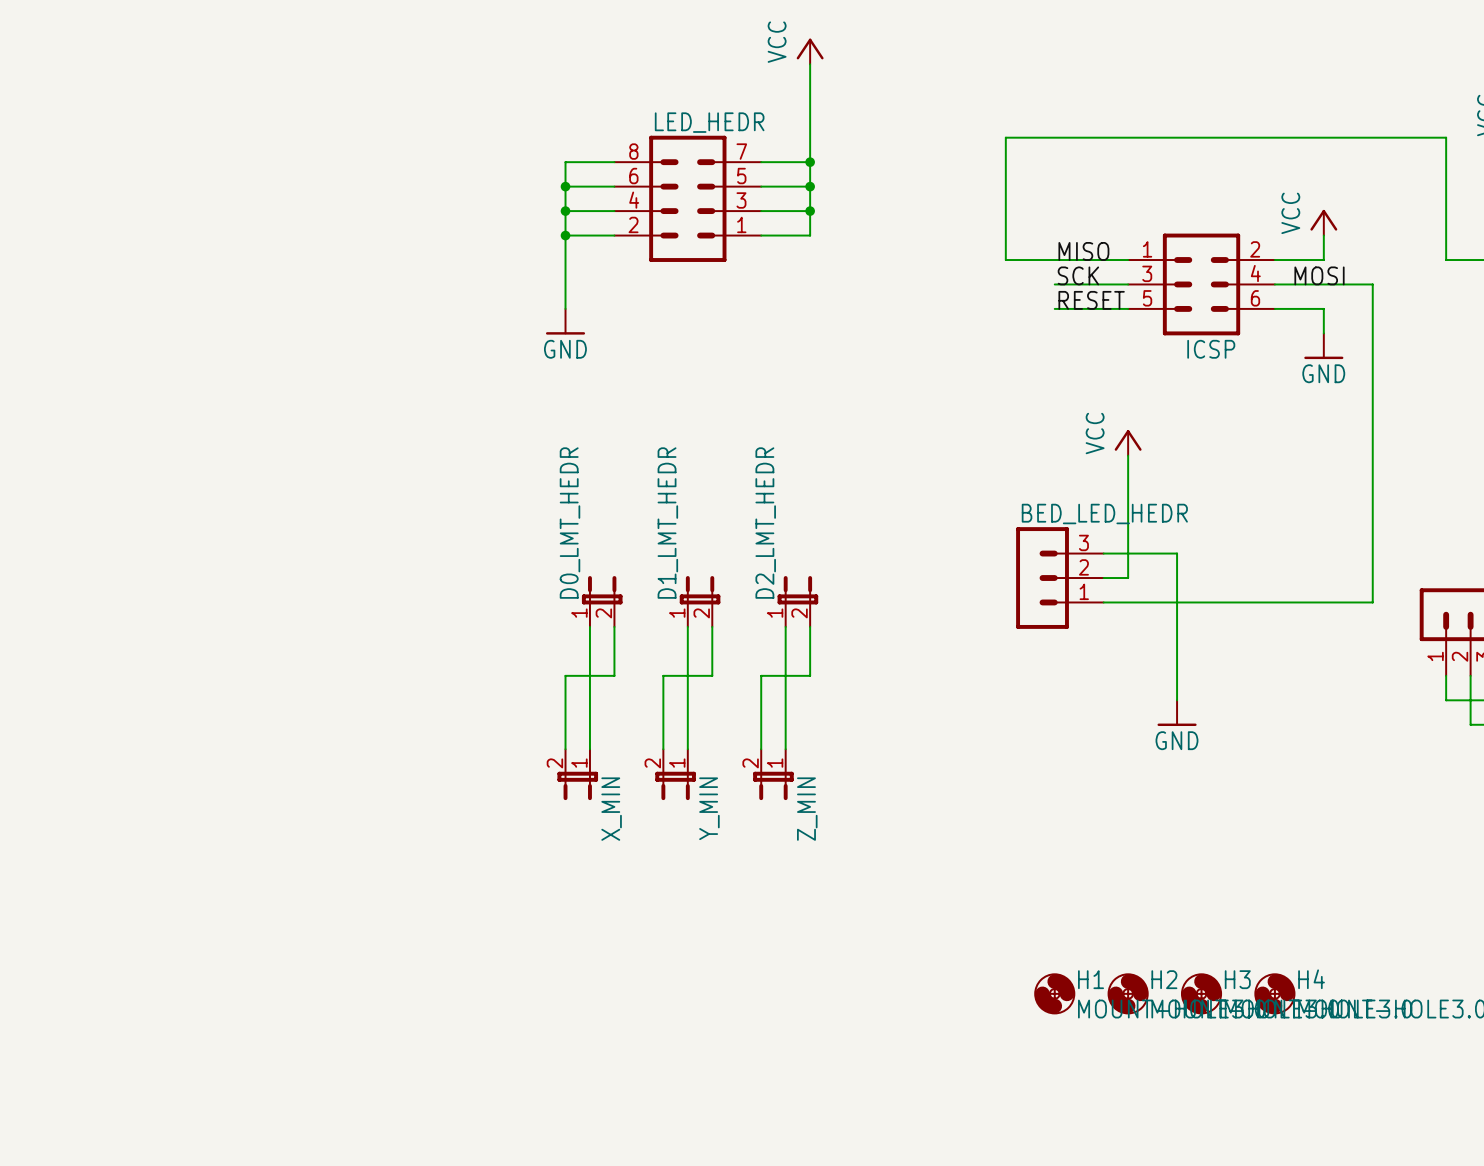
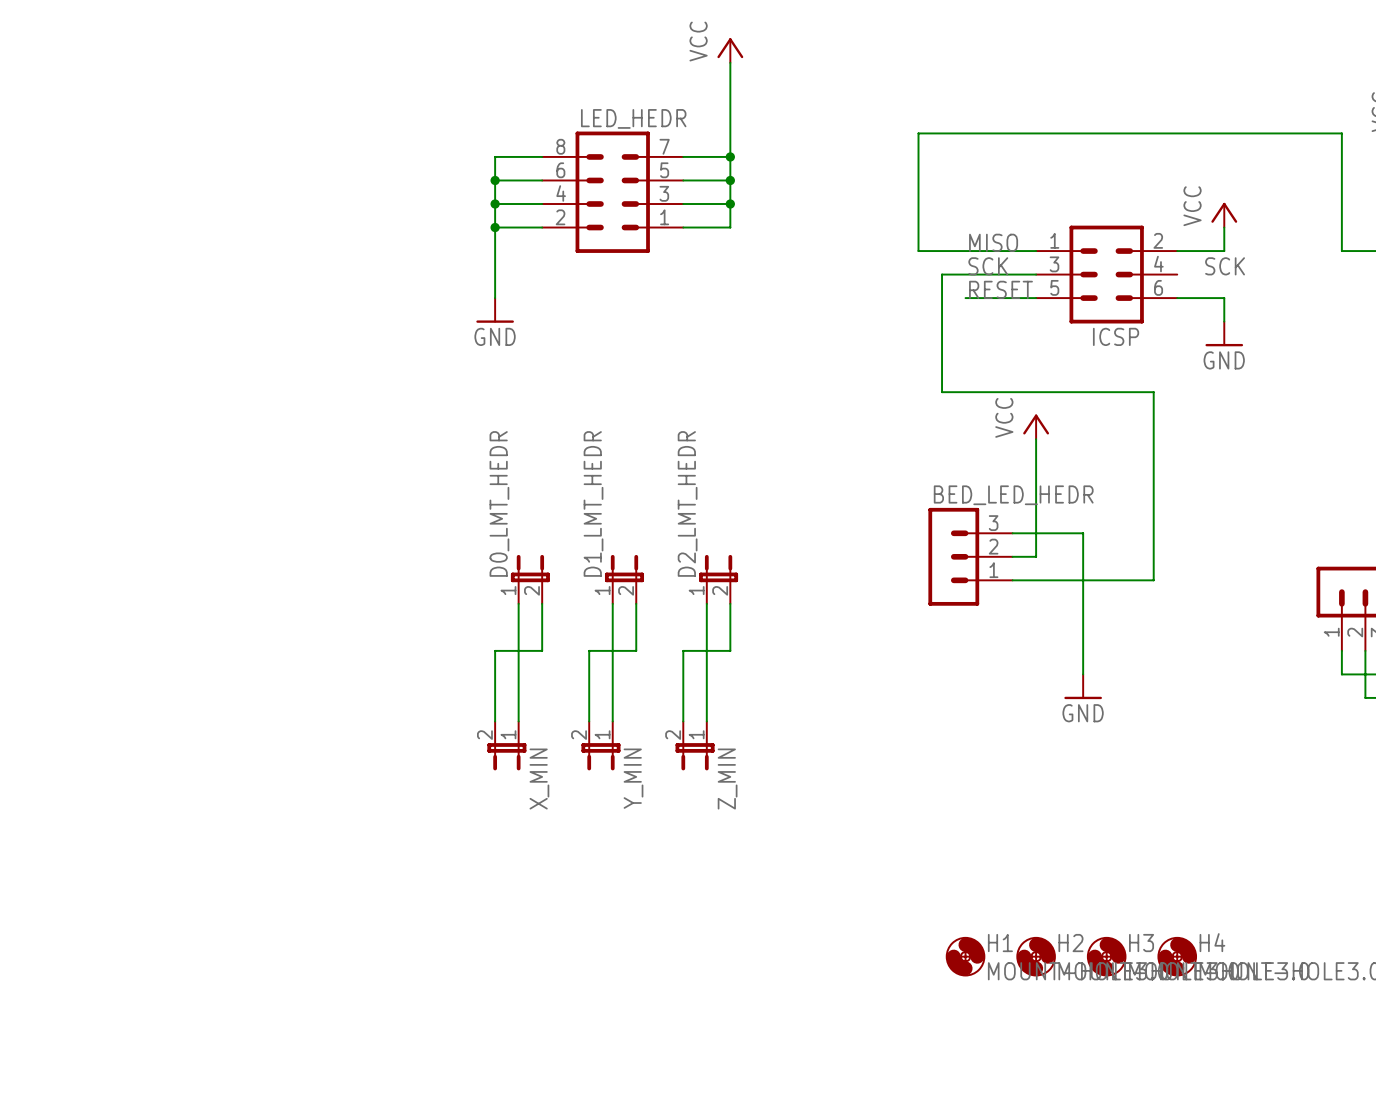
label: MOSI (1319, 275) -> SCK (1225, 266)
wire: (1274, 284) (1372, 284) (1372, 602) (1250, 602) -> (965, 274) (942, 274) (942, 392) (1153, 392) (1153, 580)

